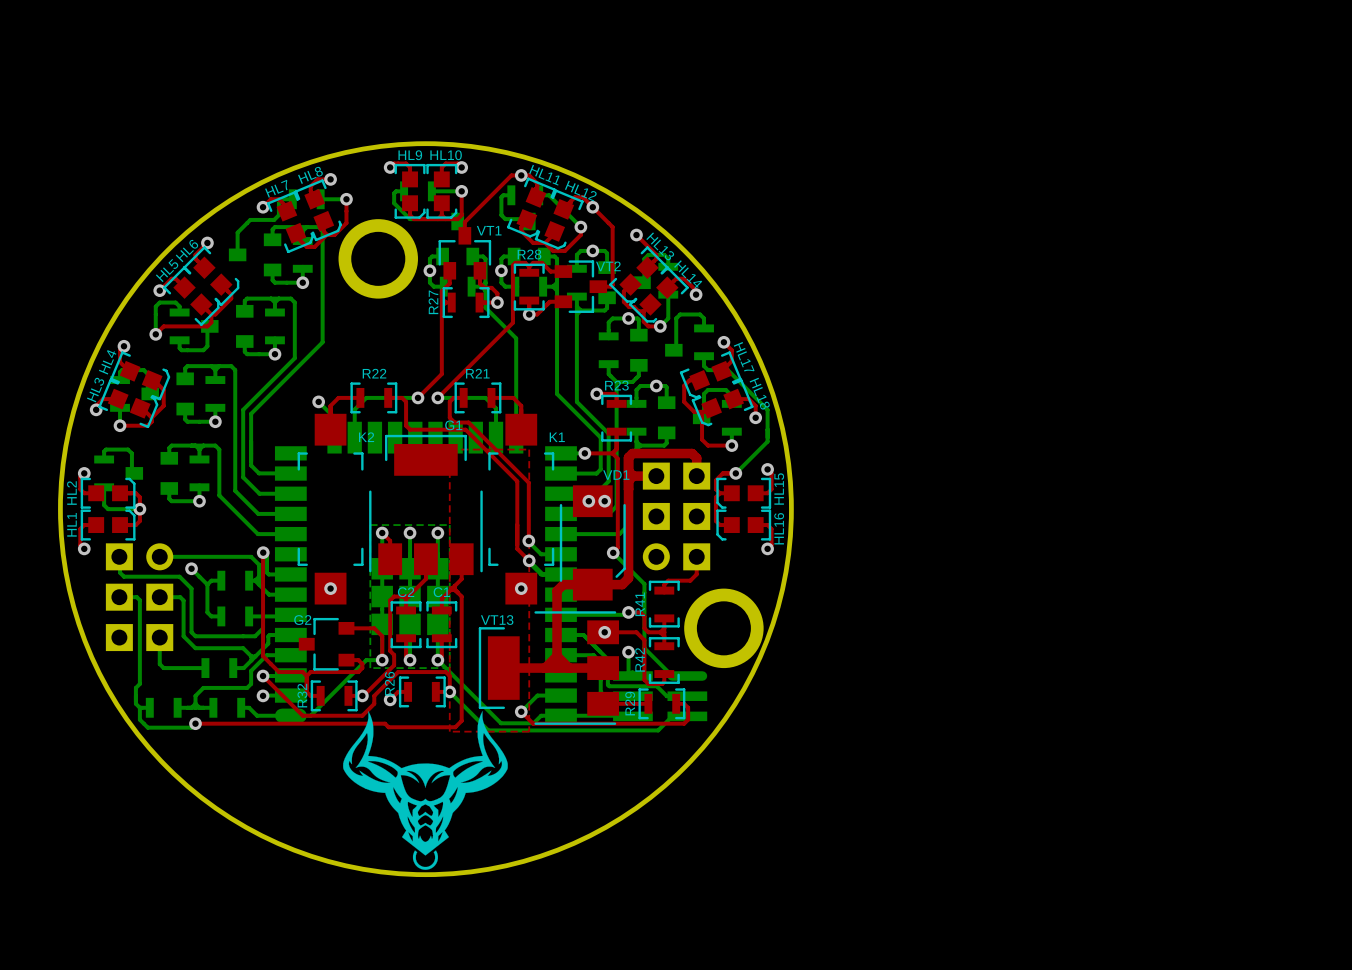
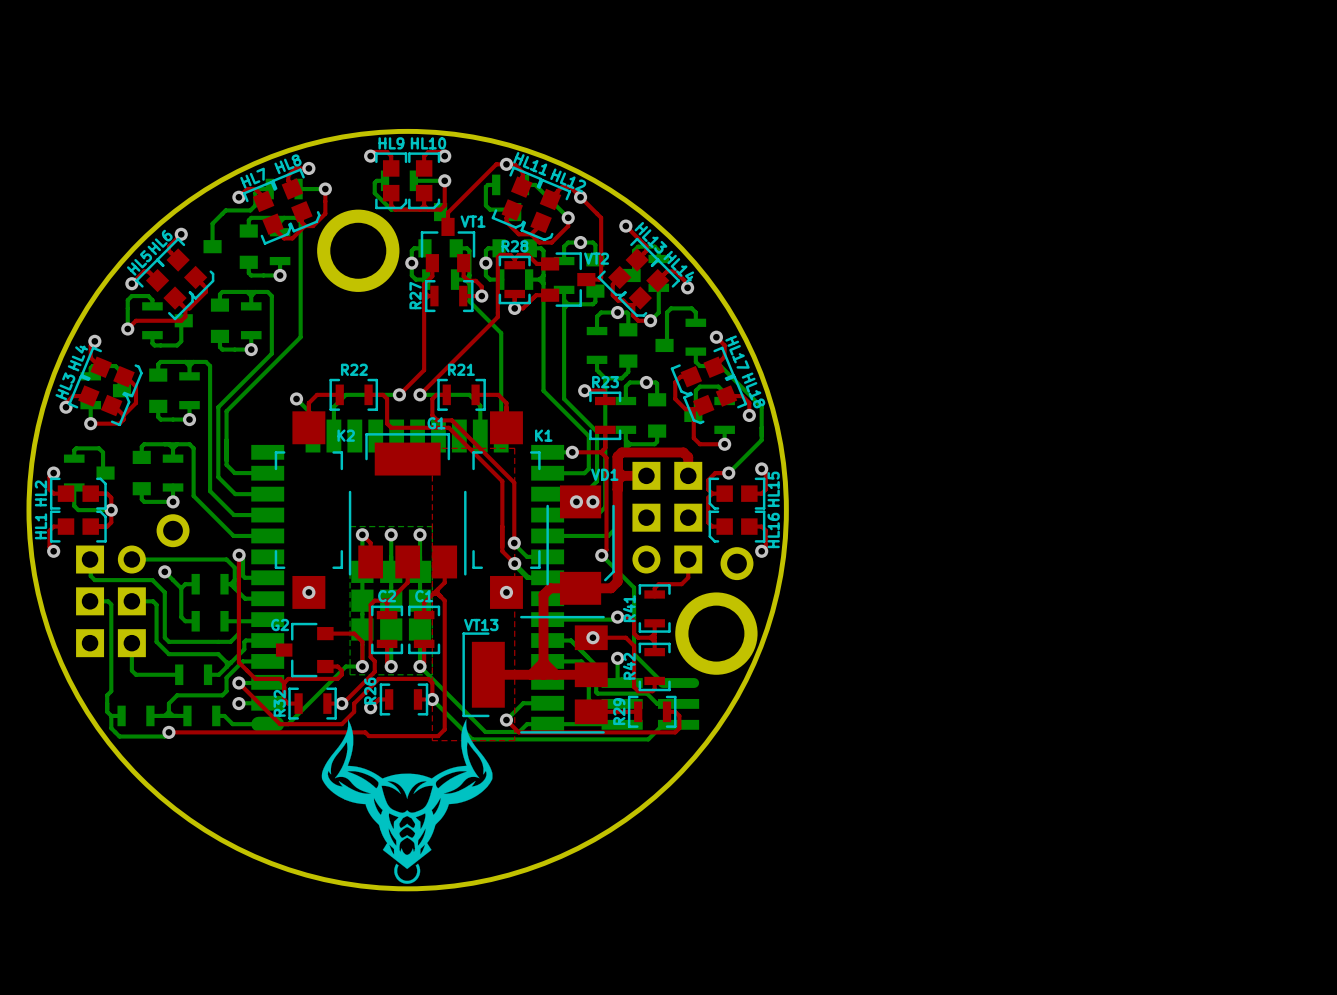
part: none -> (173, 530)
part: none -> (736, 563)

